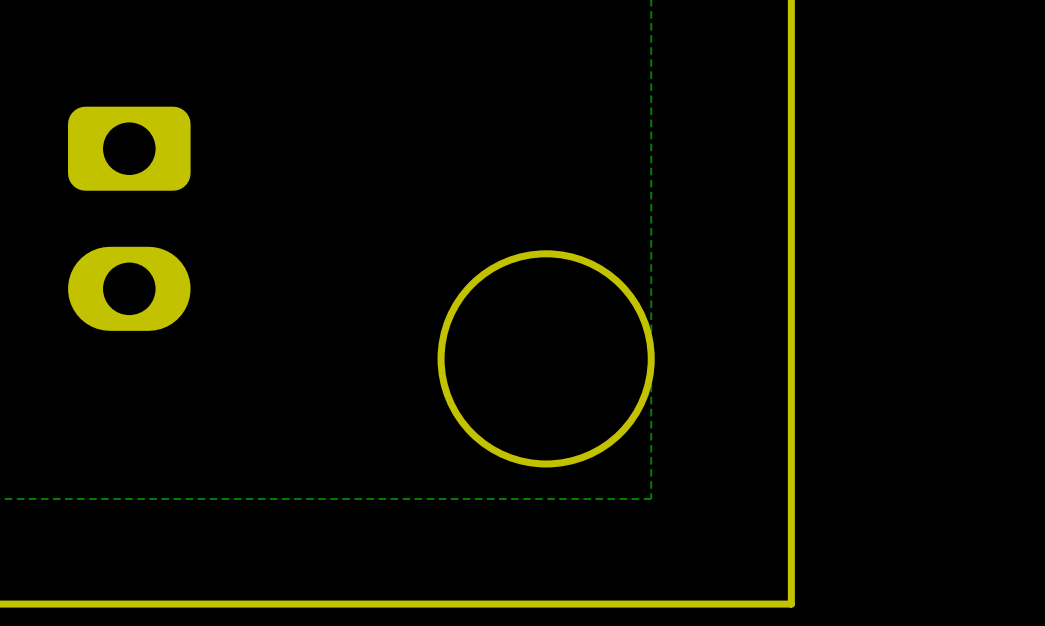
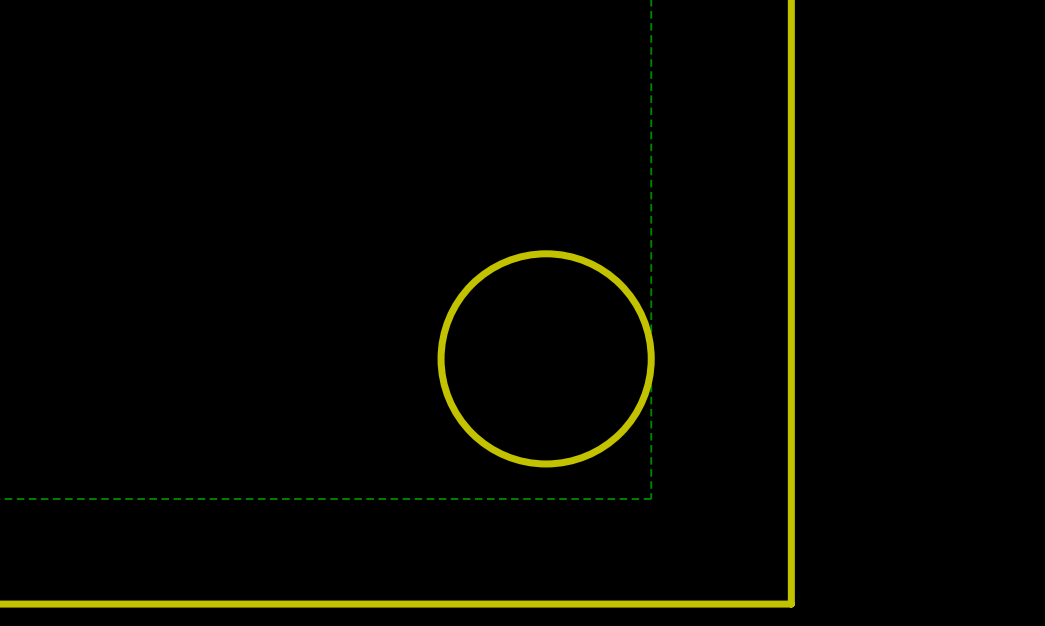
part: (129, 218) -> none

